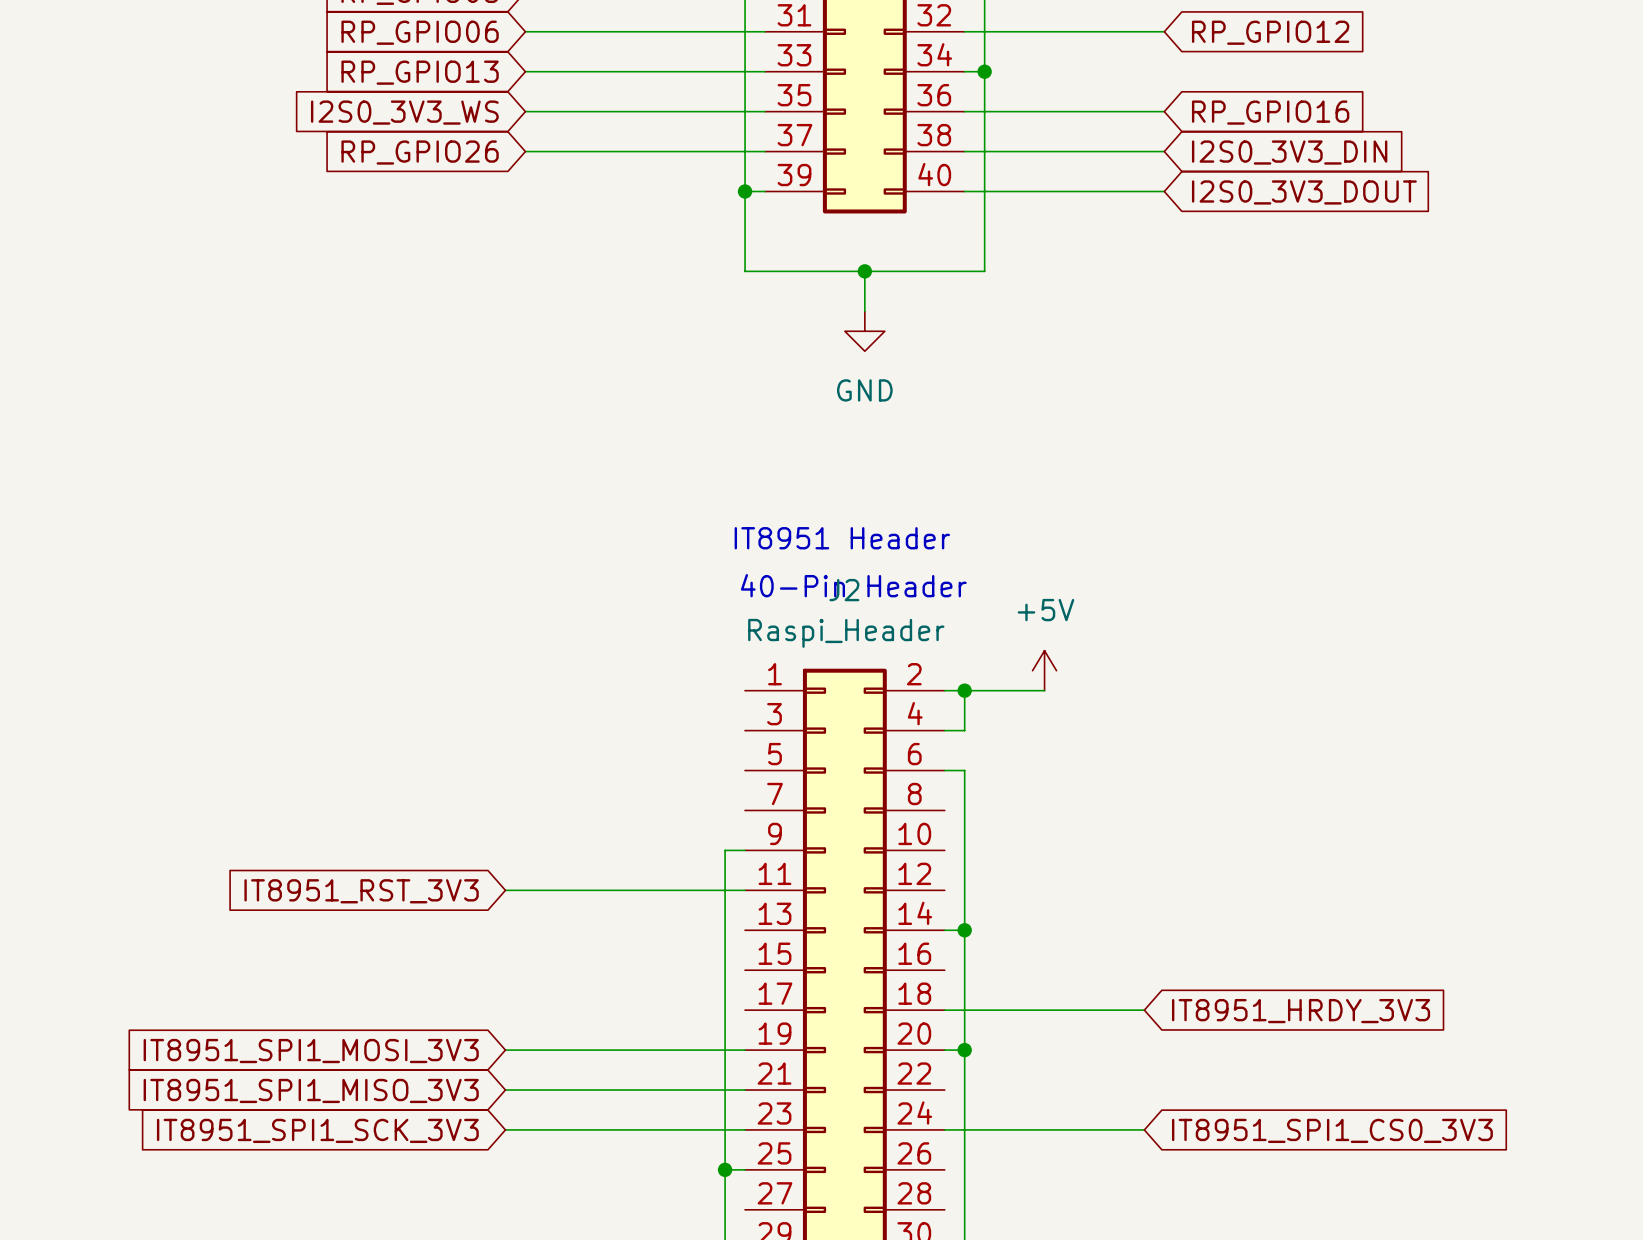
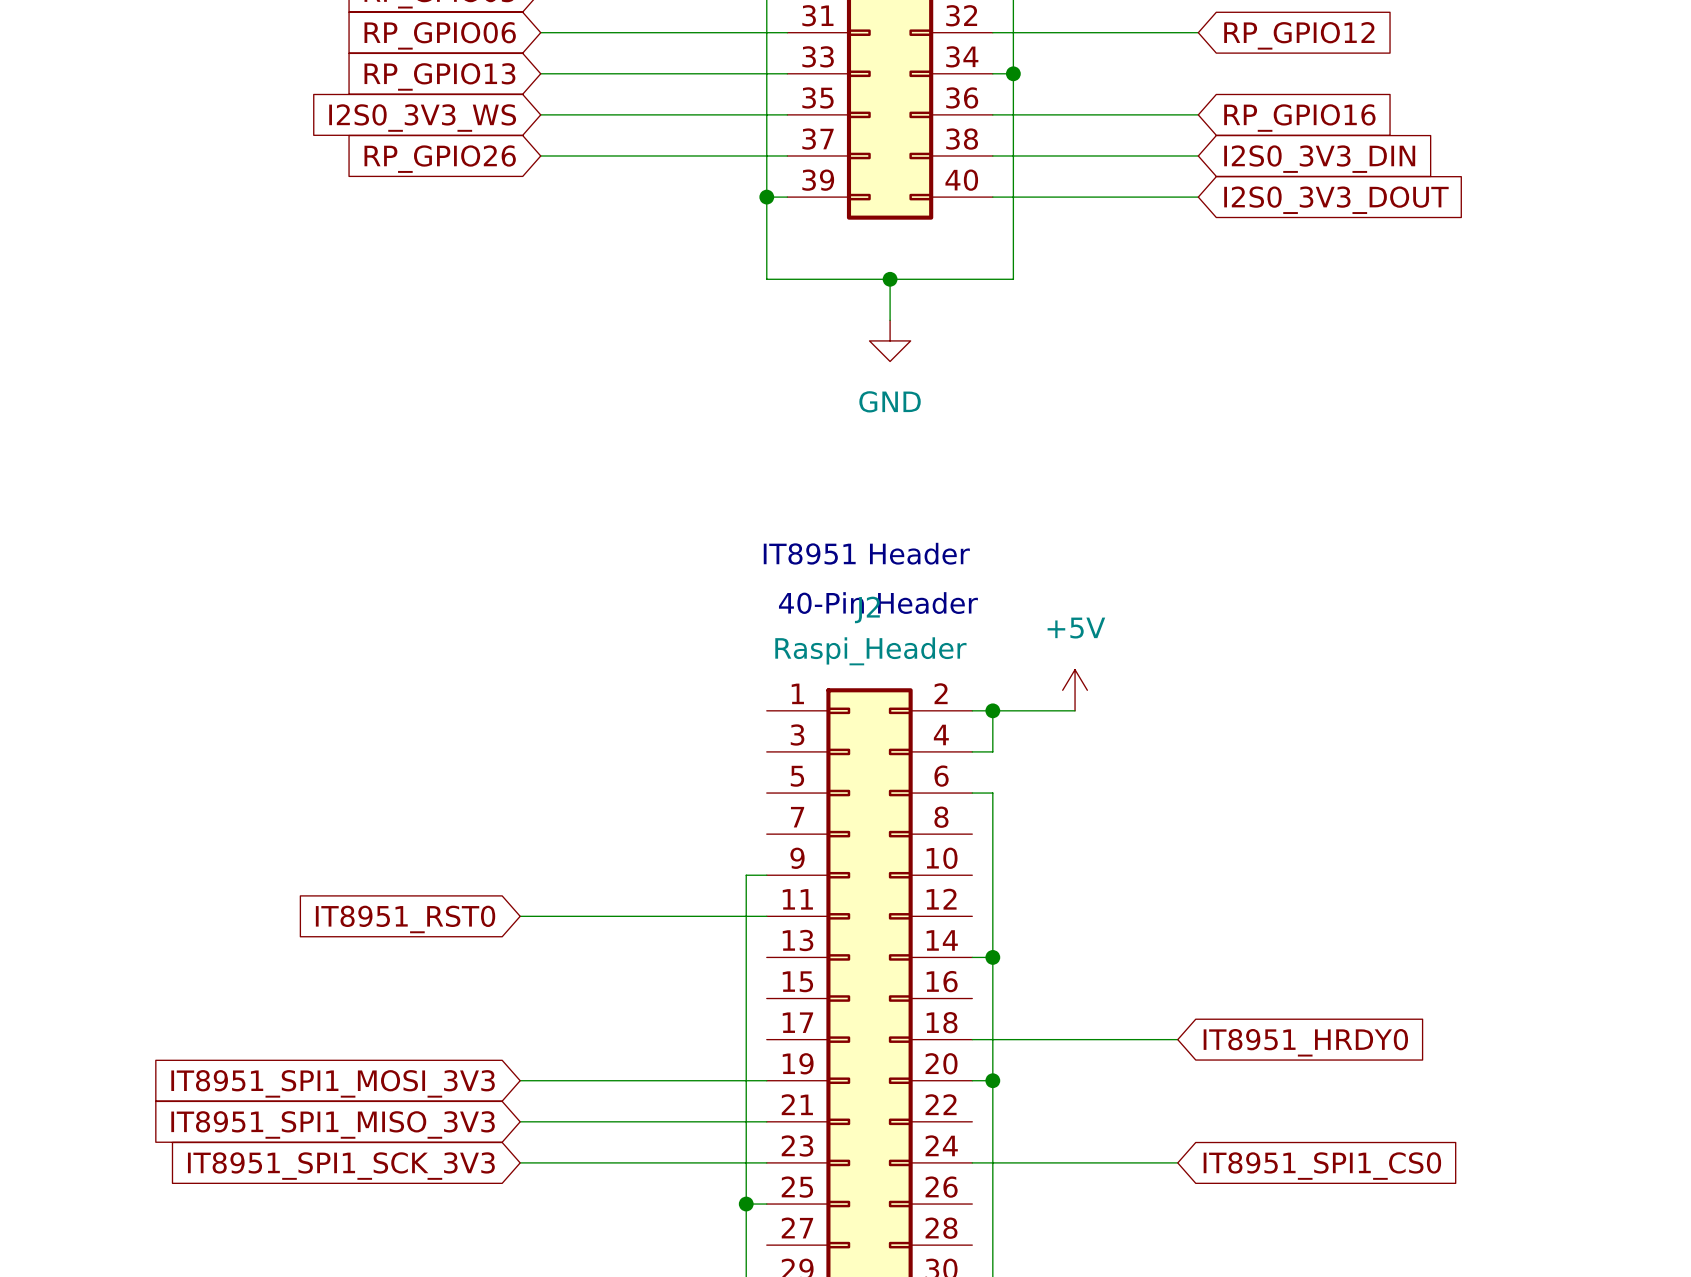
global label: IT8951_RST_3V3 (361, 891) -> IT8951_RST0 (405, 919)
global label: IT8951_HRDY_3V3 (1301, 1011) -> IT8951_HRDY0 (1305, 1042)
global label: IT8951_SPI1_CS0_3V3 (1332, 1130) -> IT8951_SPI1_CS0 (1322, 1166)

